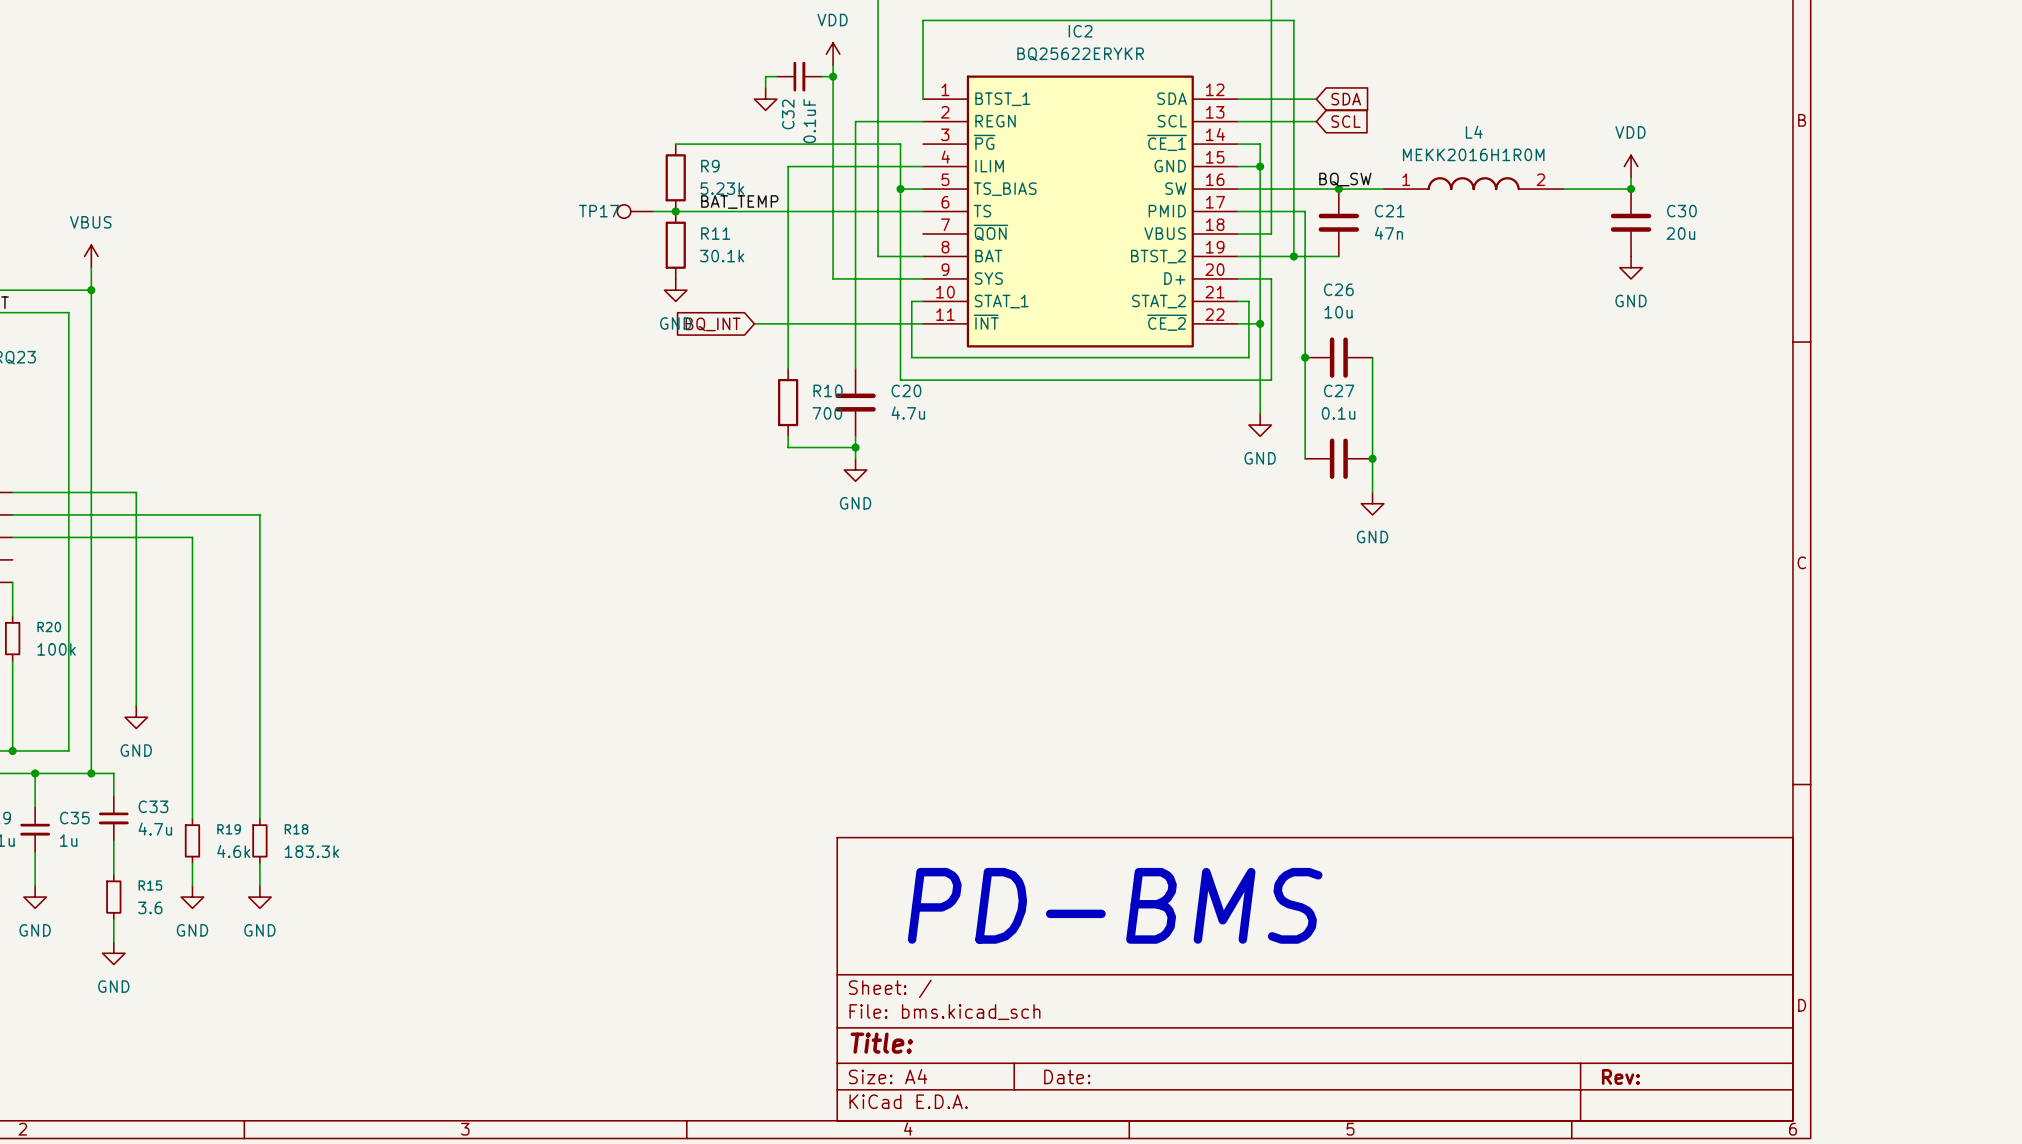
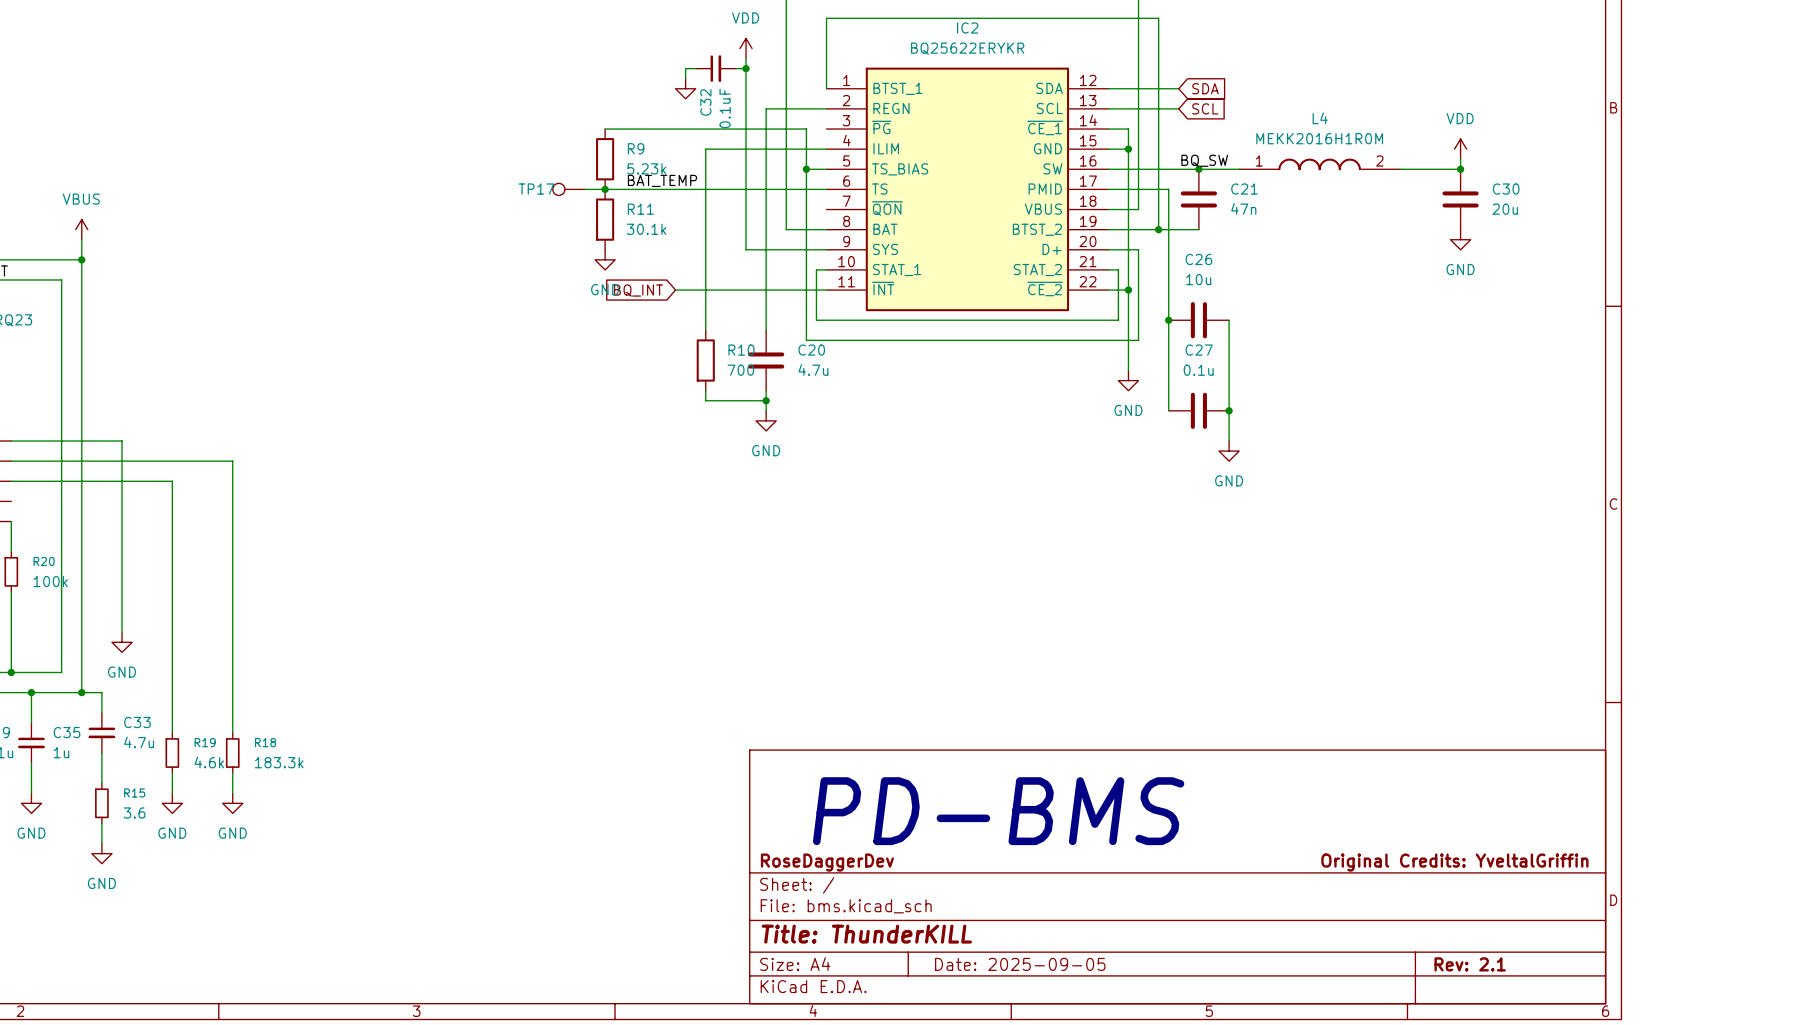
title block: none -> RoseDaggerDev Original Credits: YveltalGriffin (1174, 862)
title block: Title: (881, 1043) -> Title: ThunderKILL (866, 934)
title block: Date: (1067, 1076) -> Date: 2025-09-05 (1020, 964)
title block: Rev: (1620, 1076) -> Rev: 2.1 (1470, 964)

